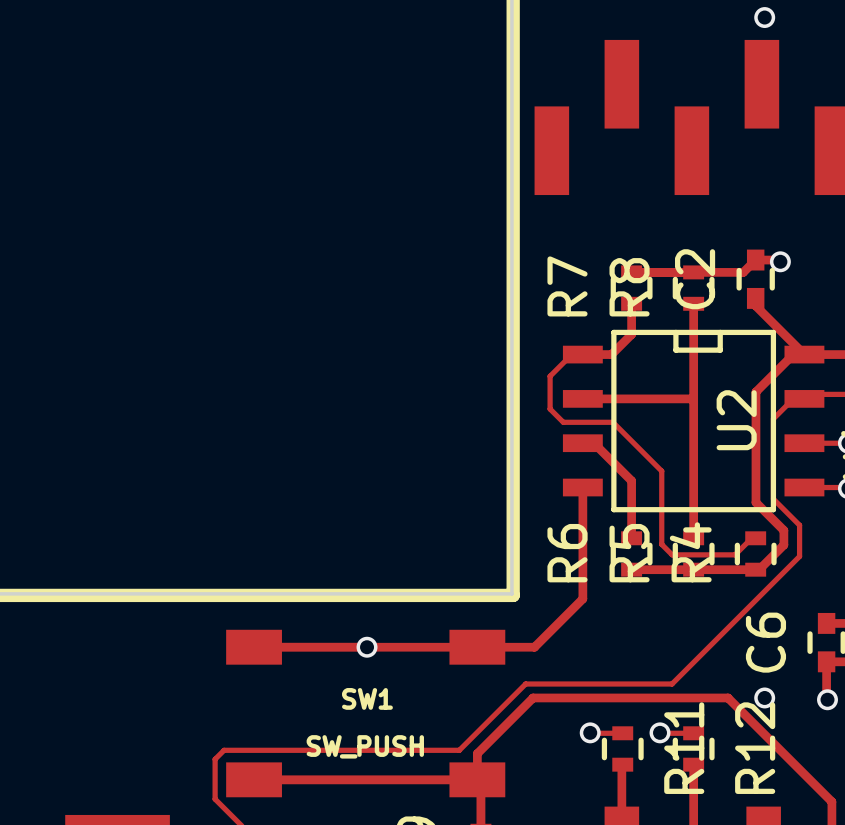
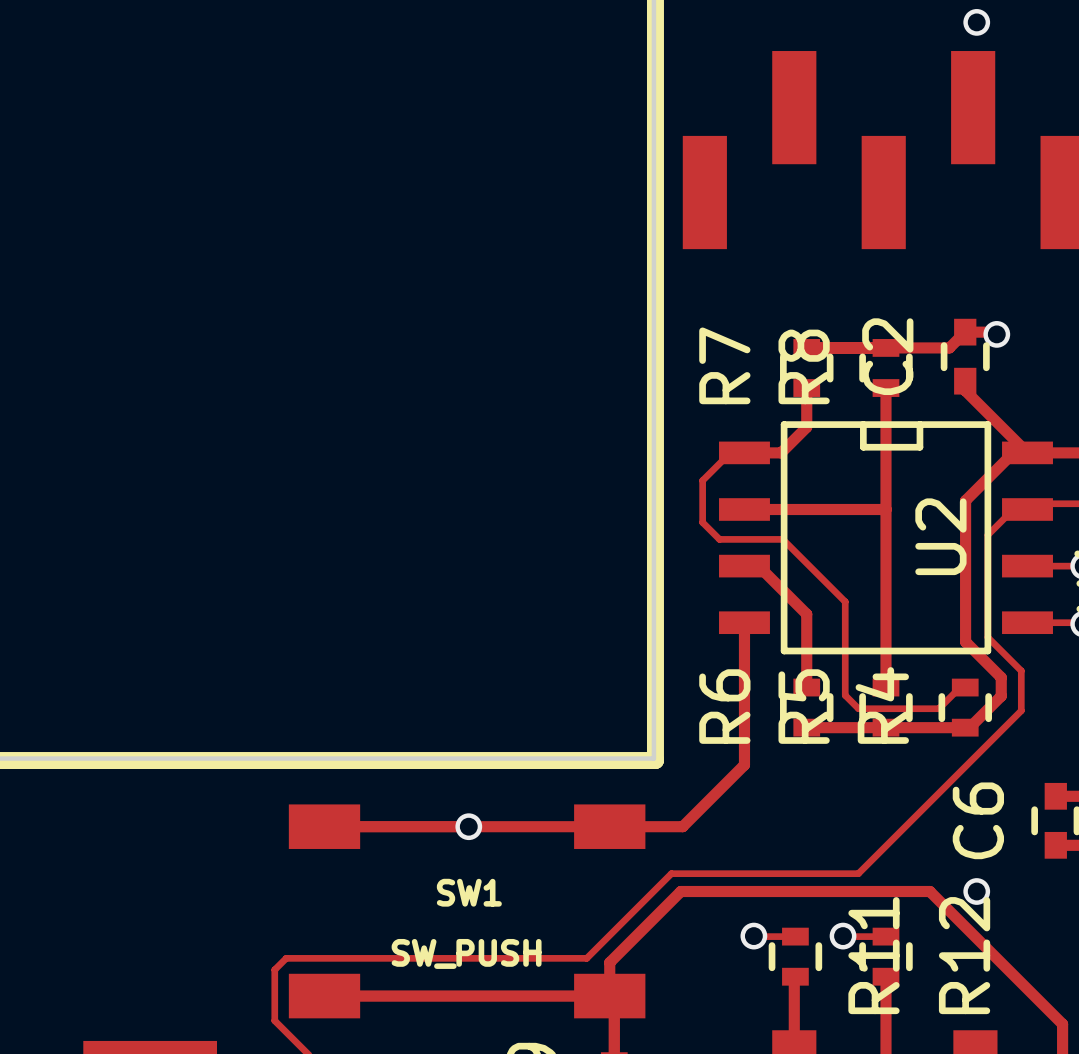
track: (826, 661) (827, 699) -> none
via: (827, 699) -> none

